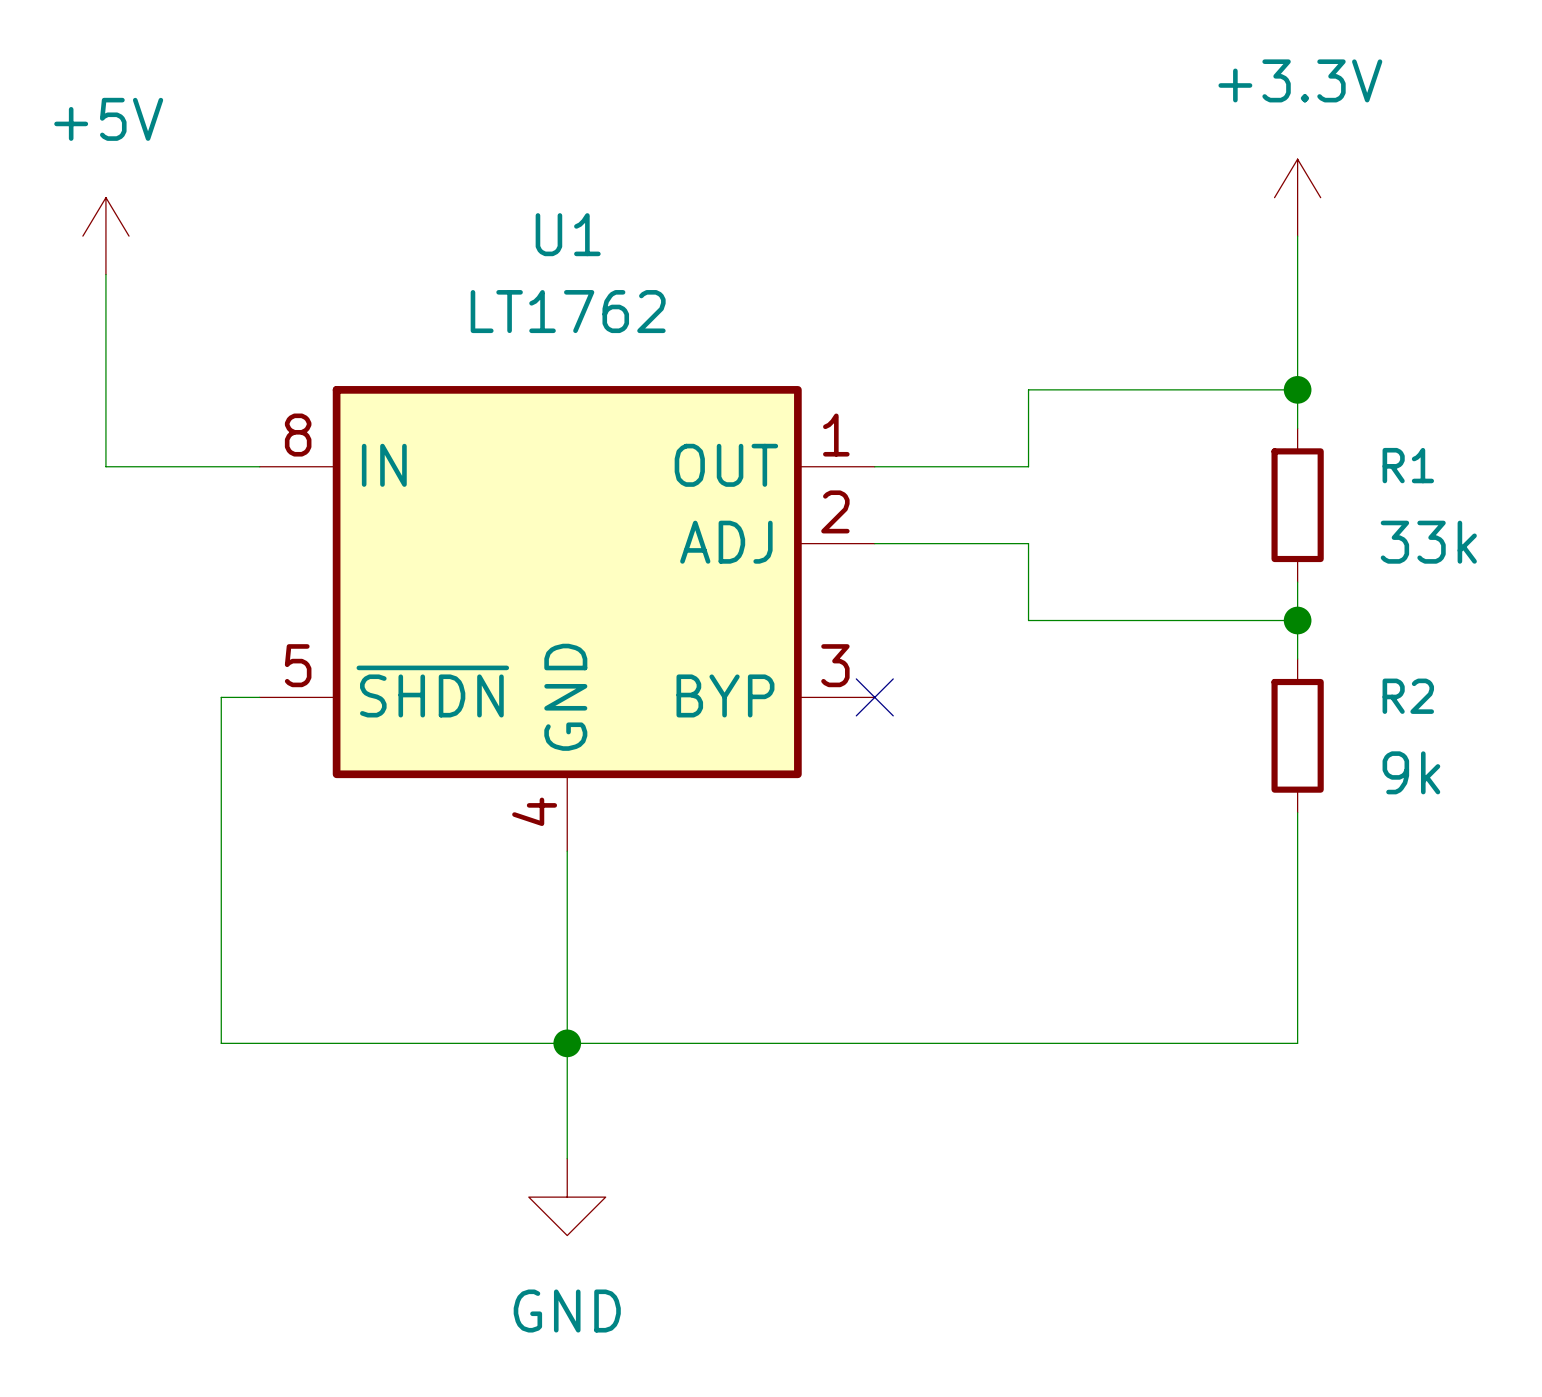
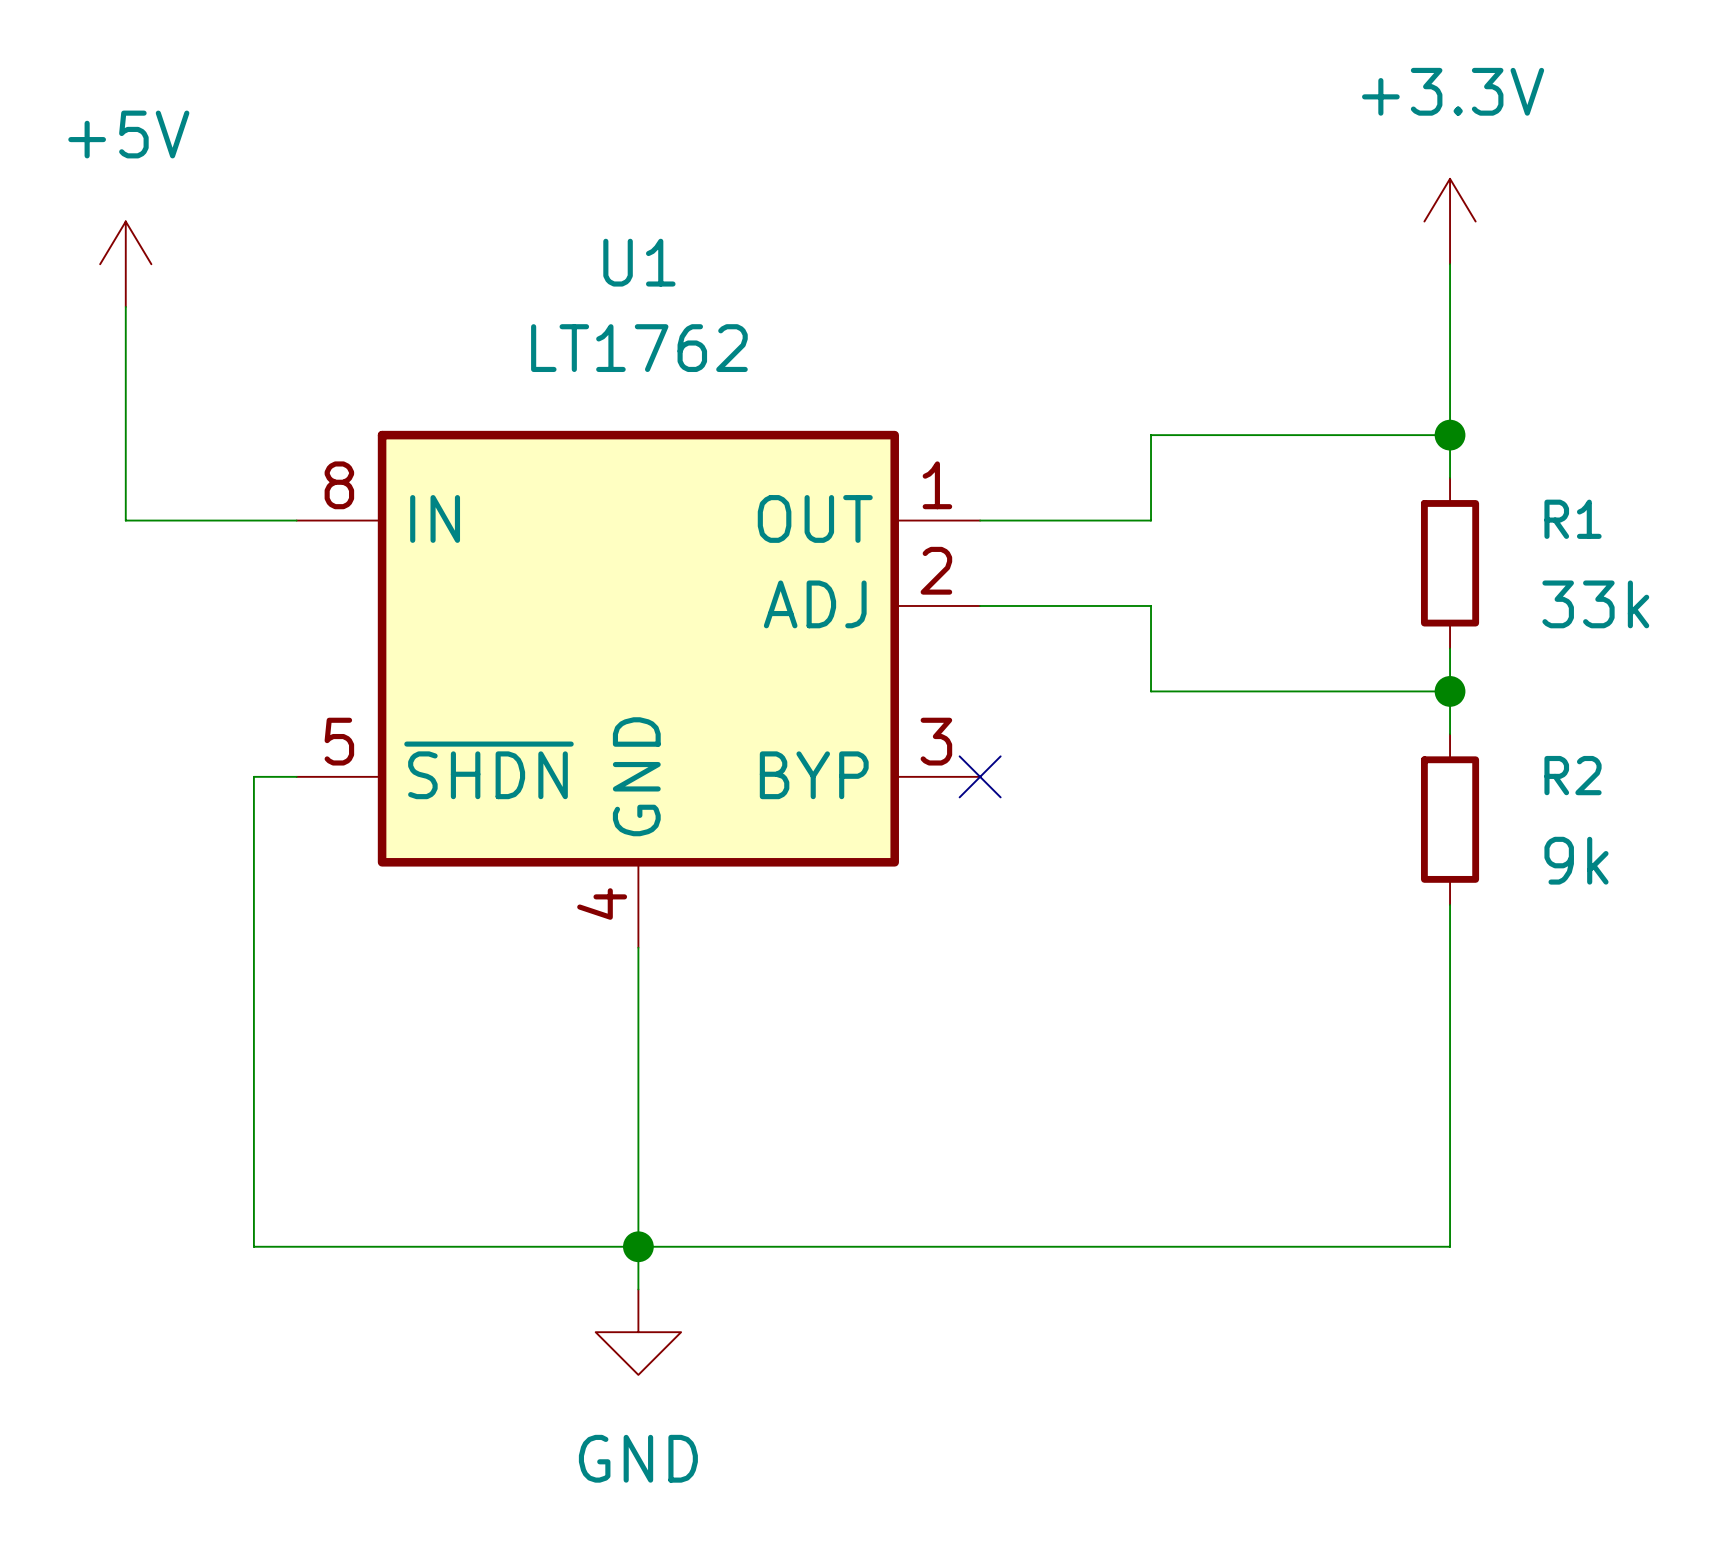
wire: (221, 1043) (1297, 1043) -> (253, 1161) (253, 1246) (1450, 1246) (1450, 1161)
junction position: (567, 1043) -> (638, 1246)

